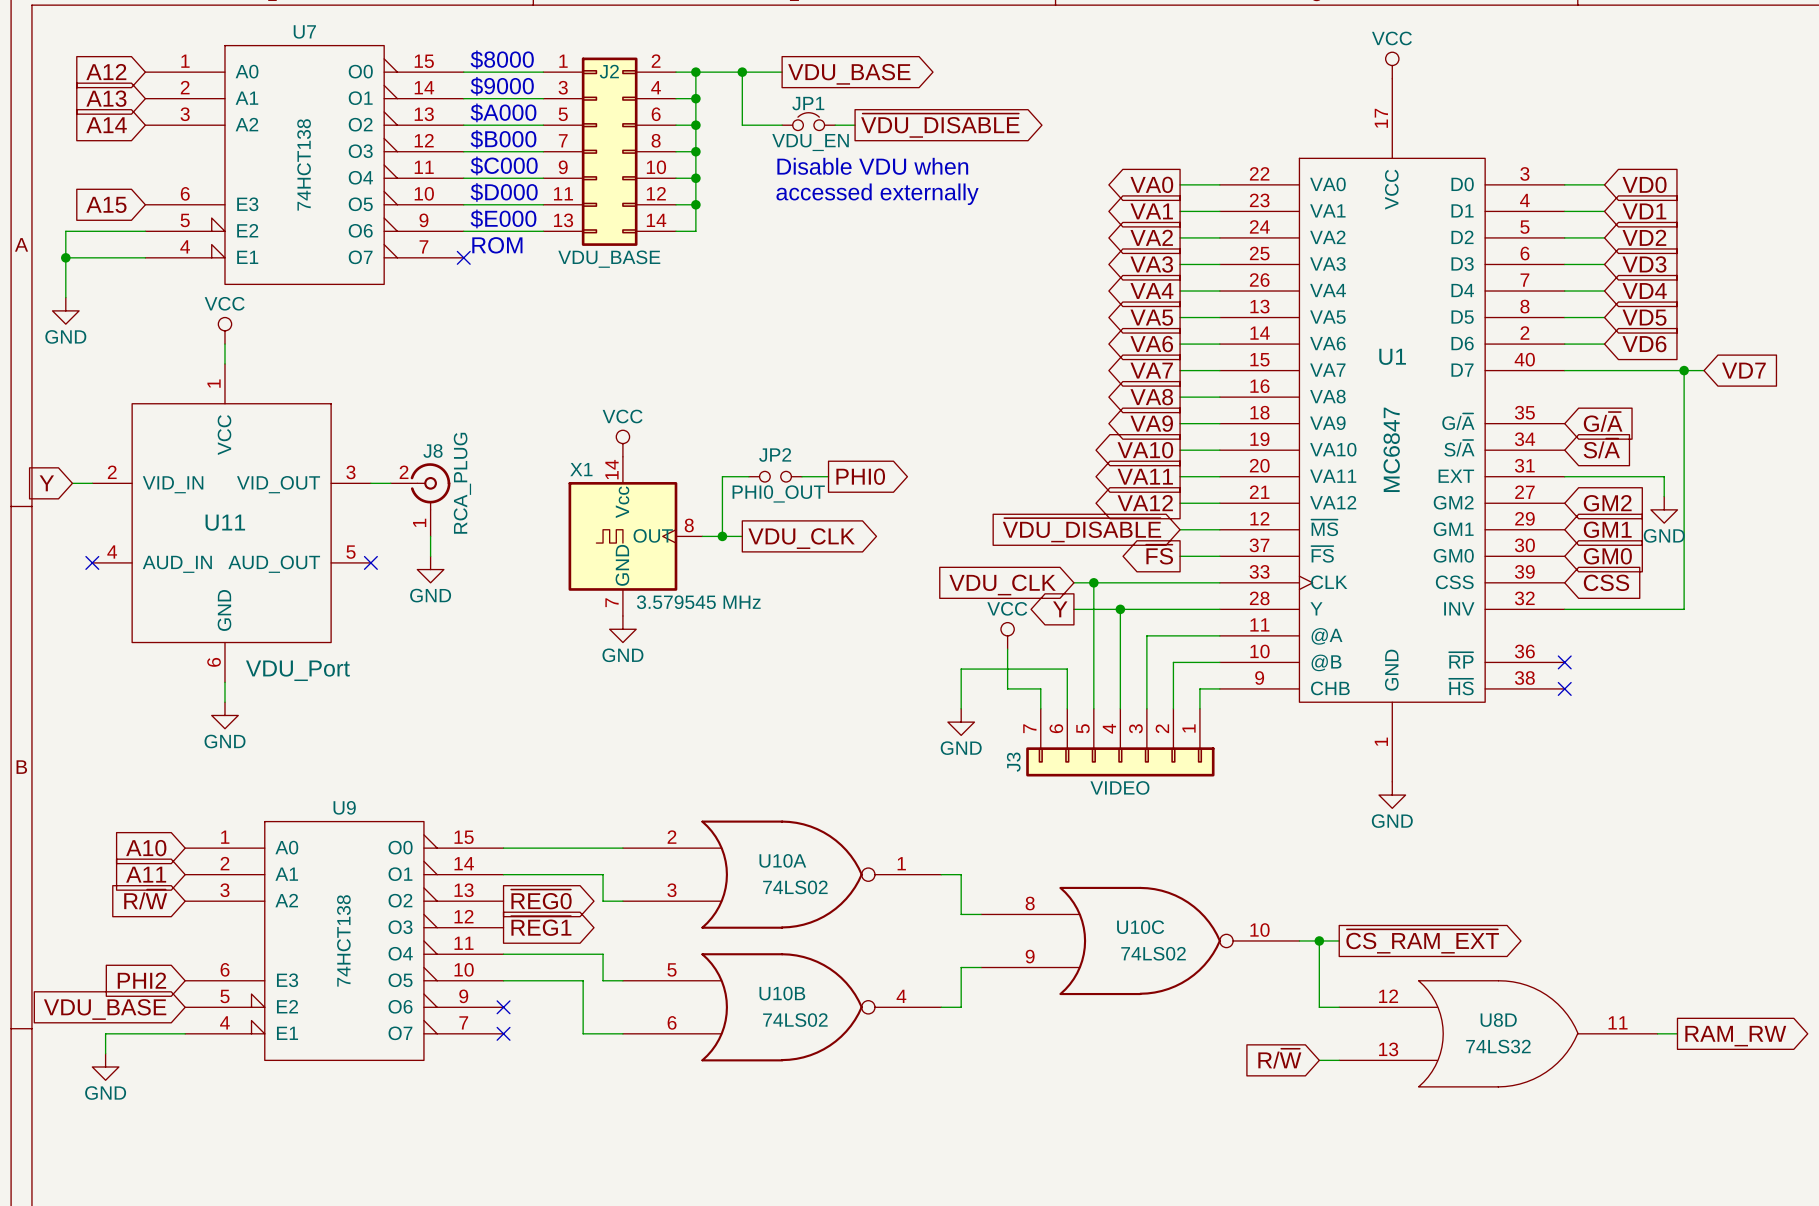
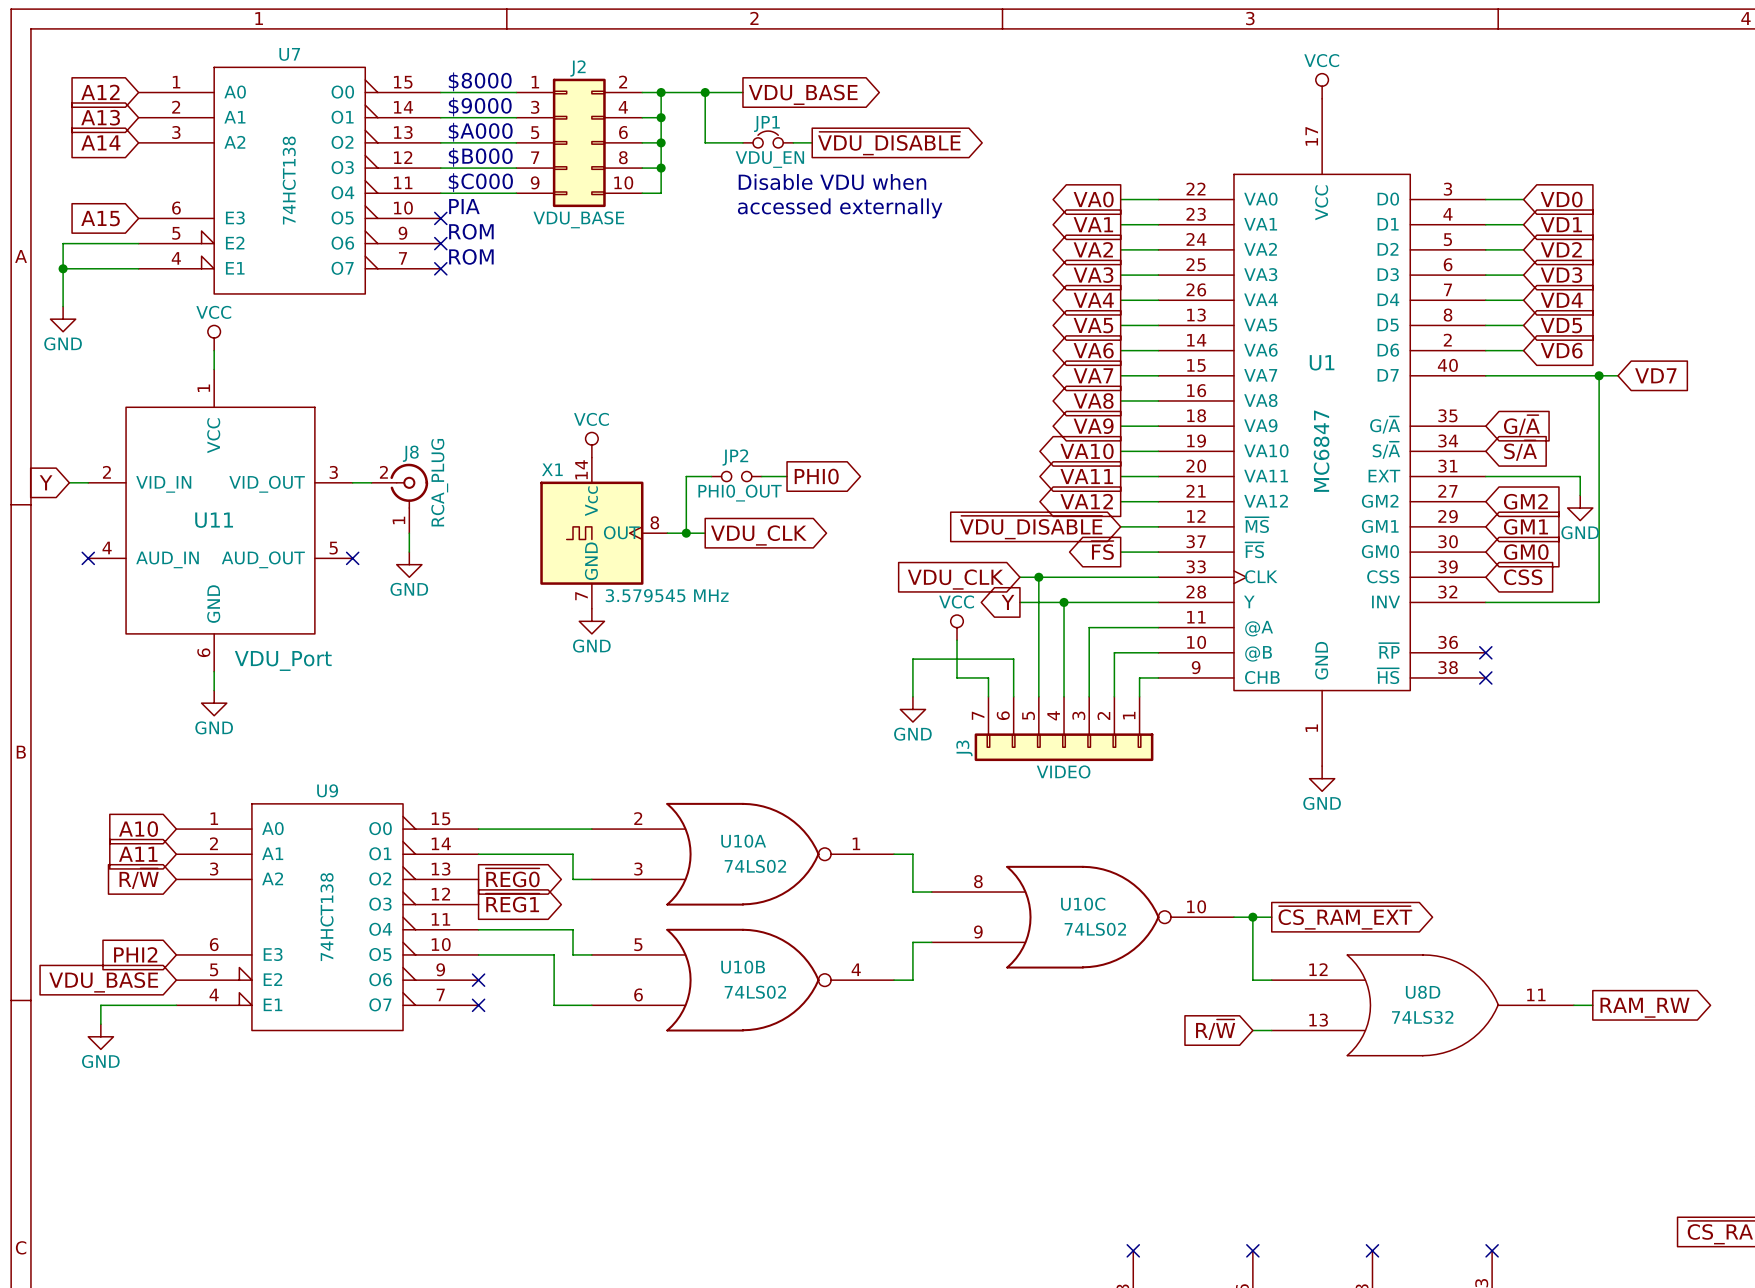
J2 symbol: [543, 57, 676, 246] -> [516, 78, 643, 208]
wire: (695, 178) (695, 231) (675, 231) -> none
junction: (695, 178) -> none
text: $D000 (504, 192) -> PIA (464, 206)
wire: (463, 204) (543, 204) -> none
no-connect mark: none -> (440, 218)
wire: (675, 204) (695, 204) -> none
junction: (695, 204) -> none
text: $E000 (503, 218) -> ROM (471, 231)
wire: (463, 231) (543, 231) -> none
no-connect mark: none -> (440, 243)
J2 value position: VDU_BASE (609, 259) -> VDU_BASE (578, 219)

